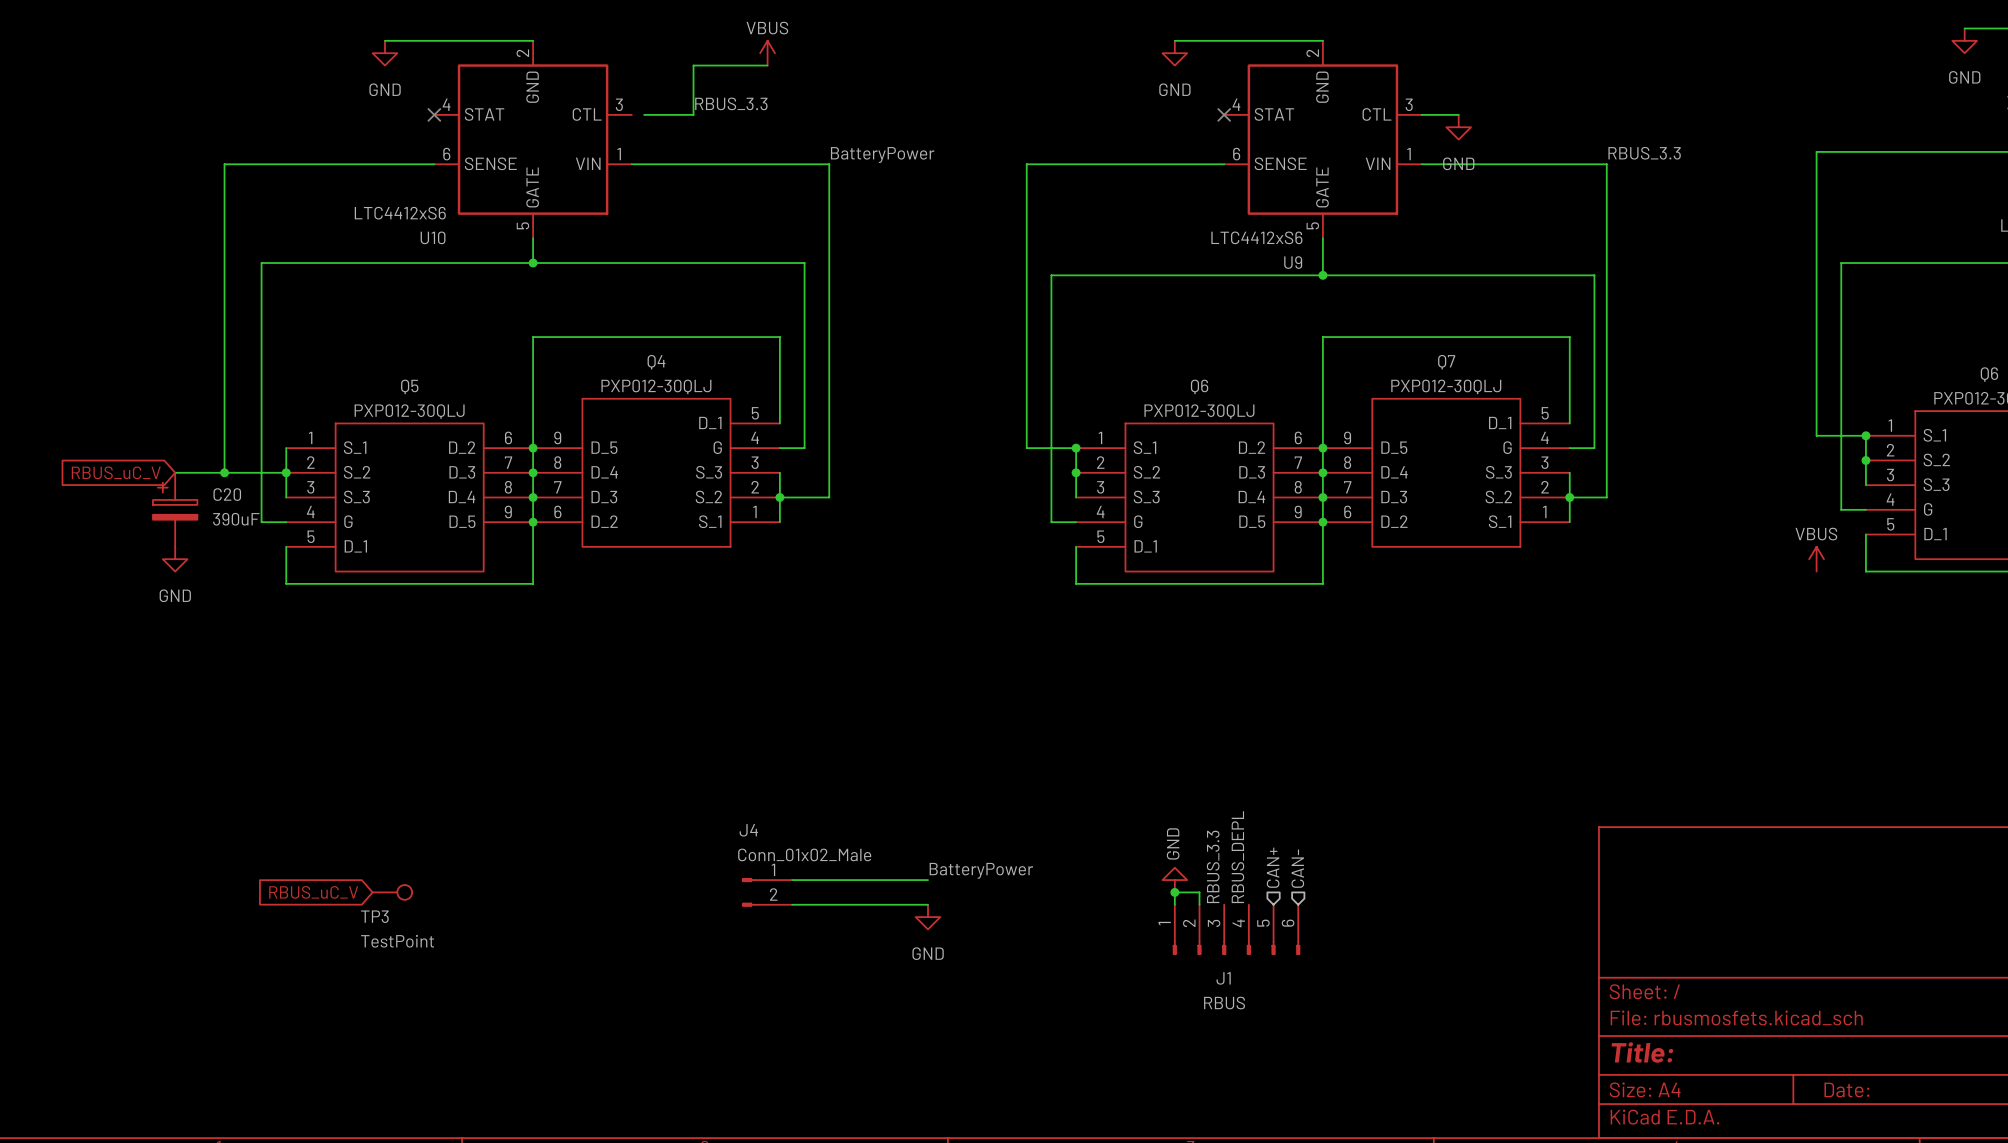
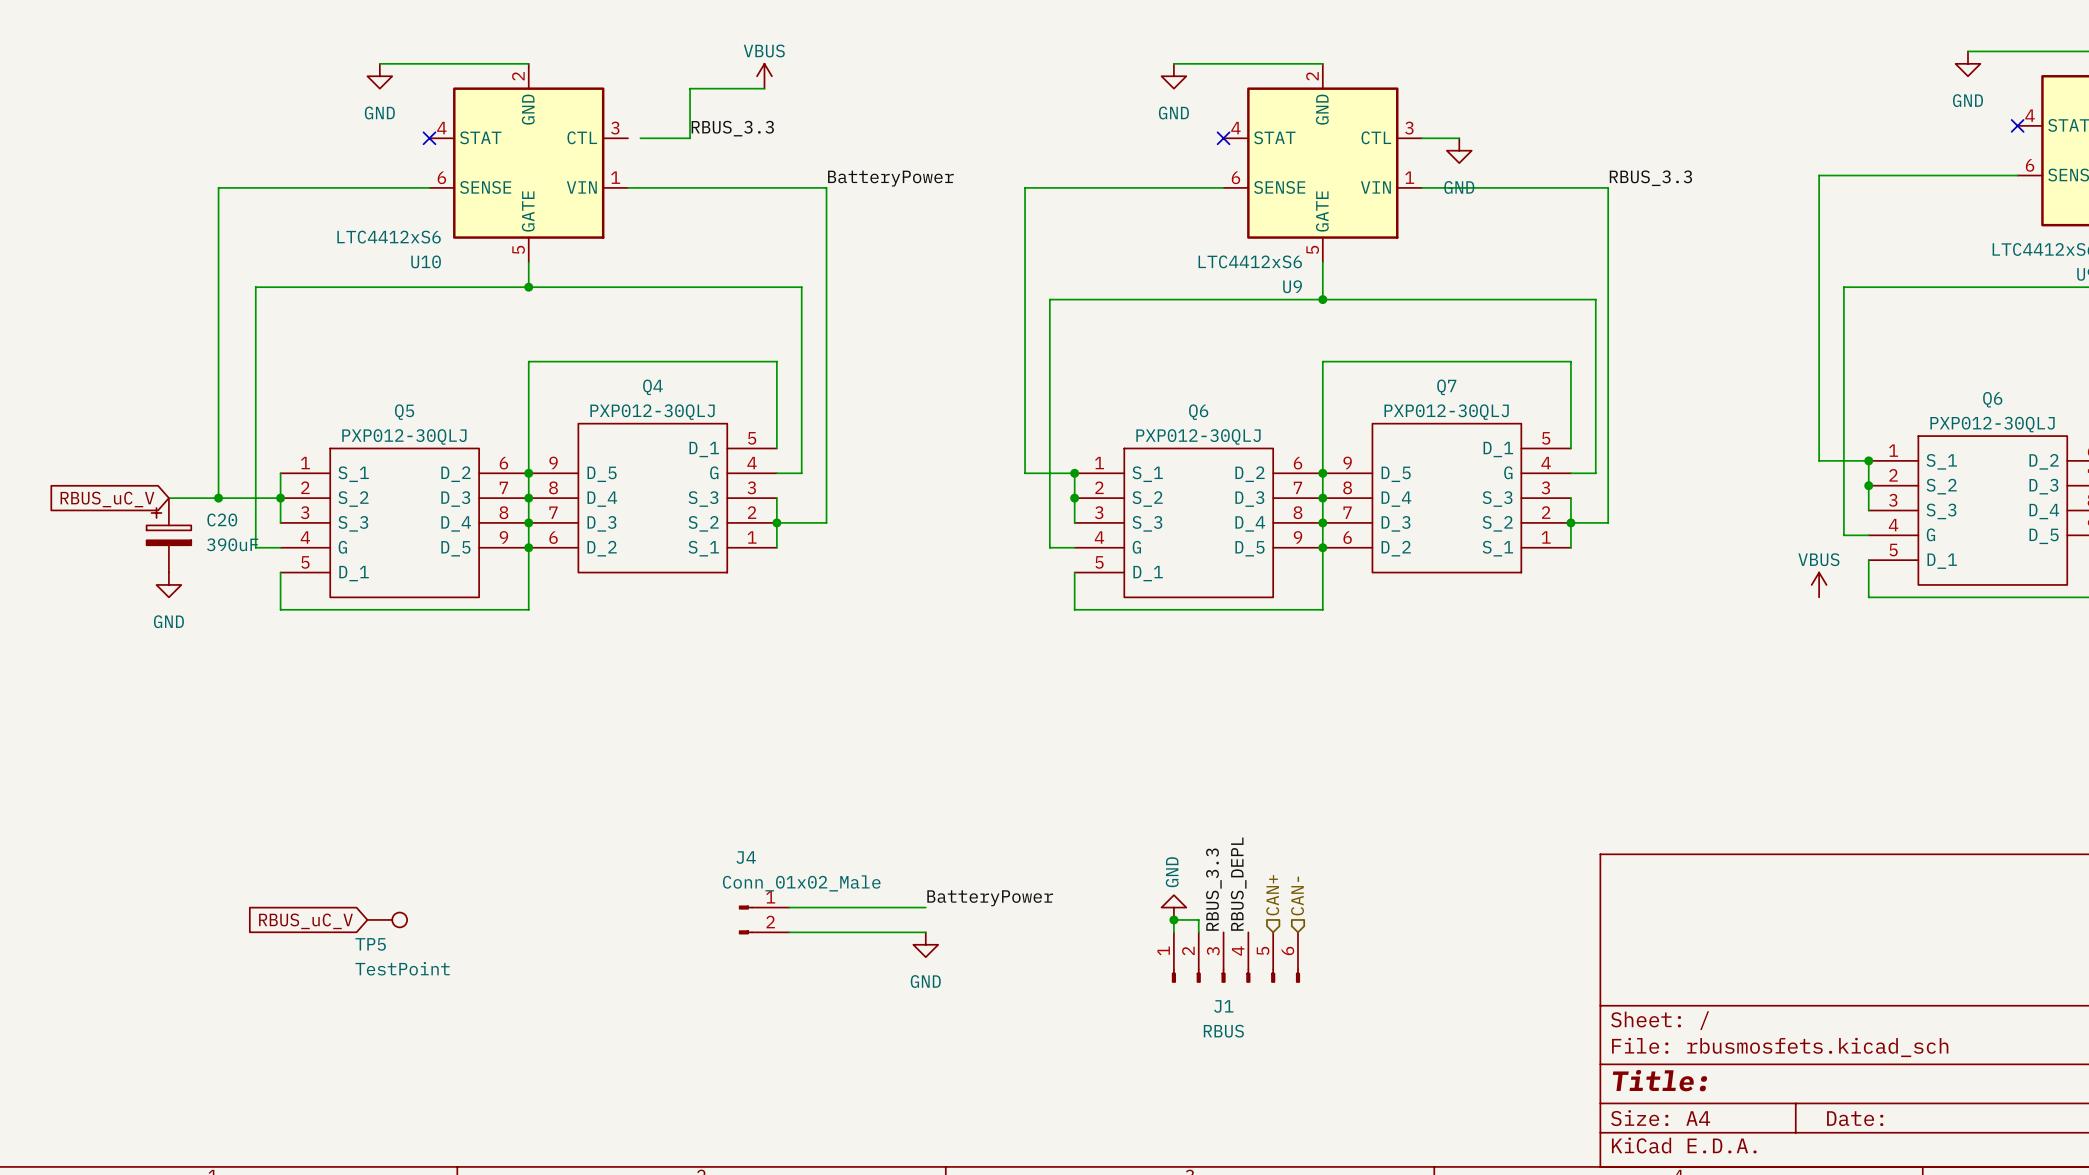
TP3 name: TP3 (374, 916) -> TP5 (370, 944)

